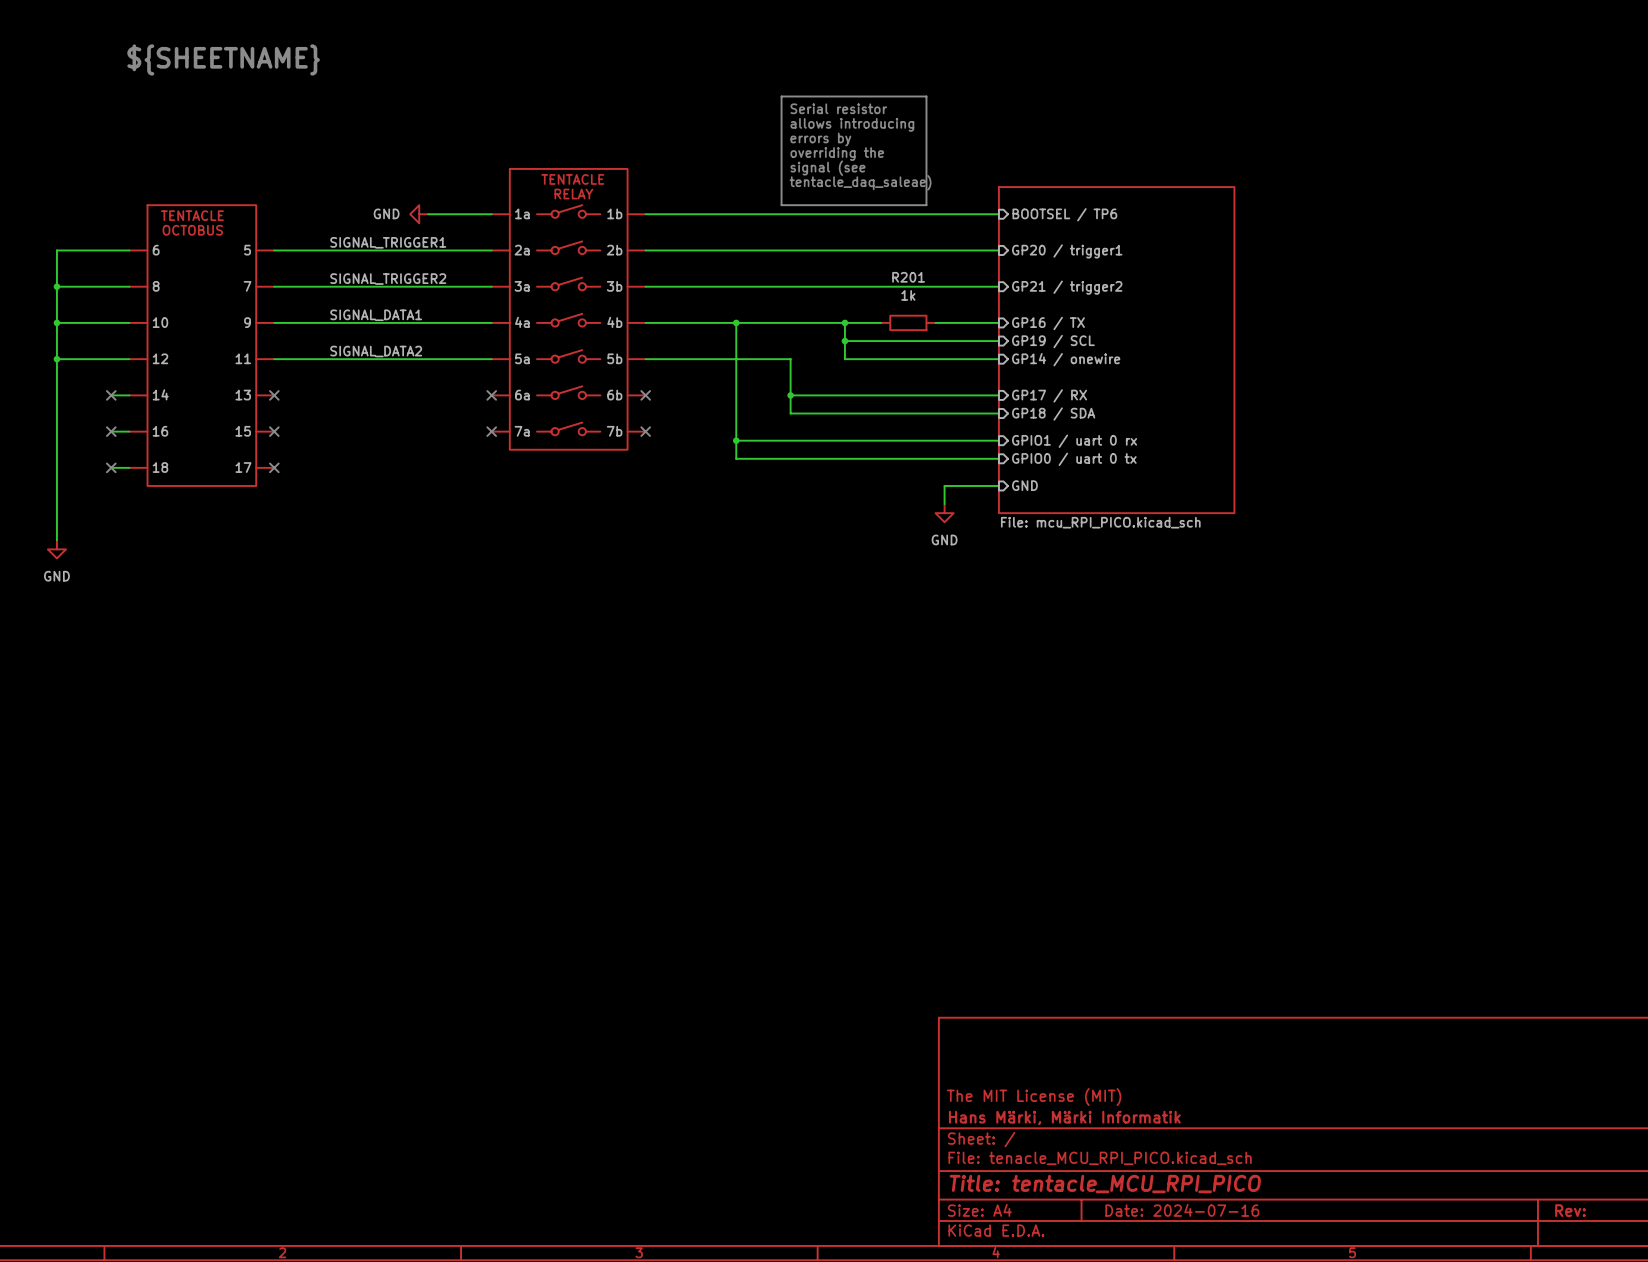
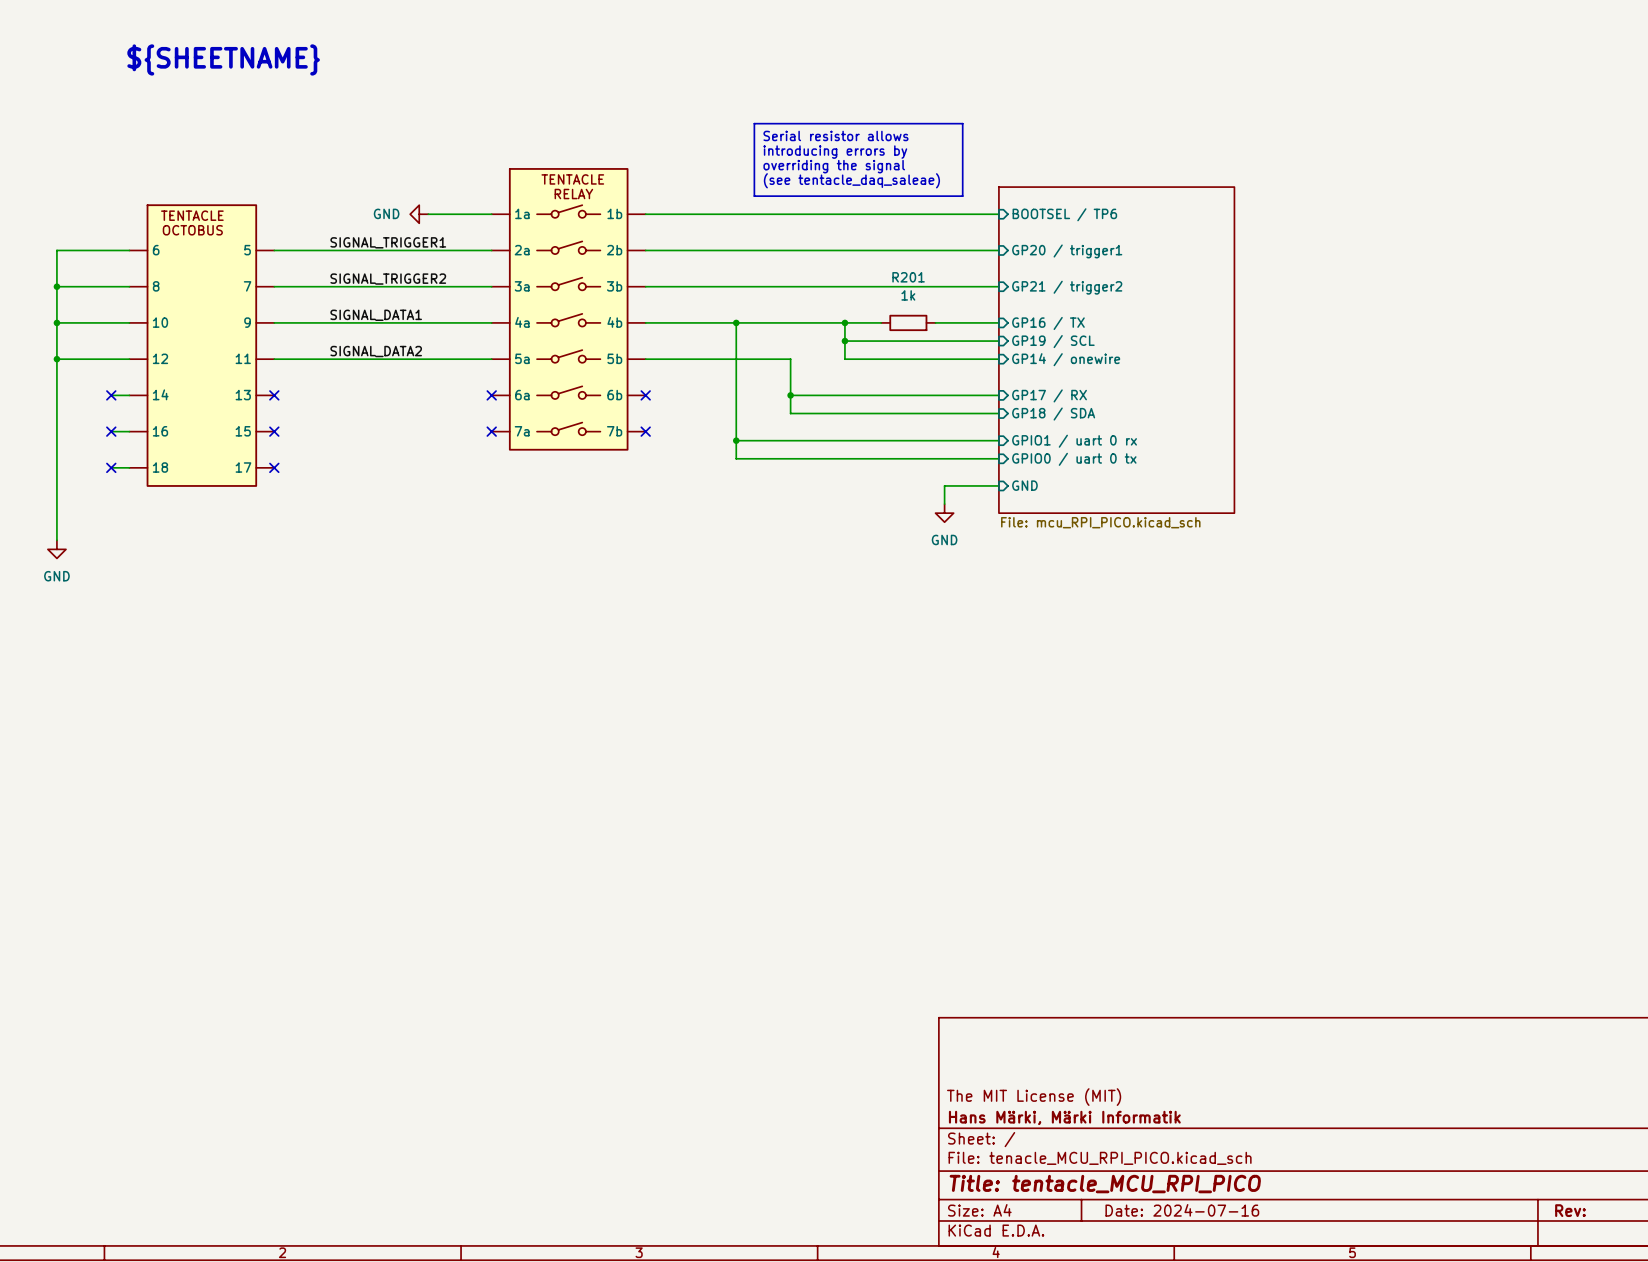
line: (781, 96) (926, 96) (926, 205) (781, 205) (781, 96) -> (754, 123) (754, 196) (962, 196) (962, 123) (754, 123)
text: Serial resistor (838, 108) -> none
text: allows introducing (852, 124) -> none
text: none -> Serial resistor allows (835, 135)
text: errors by (820, 139) -> none
text: none -> introducing errors by (835, 152)
text: overriding the (837, 154) -> overriding the signal (834, 166)
text: signal (see (827, 168) -> none
text: tentacle_daq_saleae) (860, 182) -> (see tentacle_daq_saleae) (851, 180)

